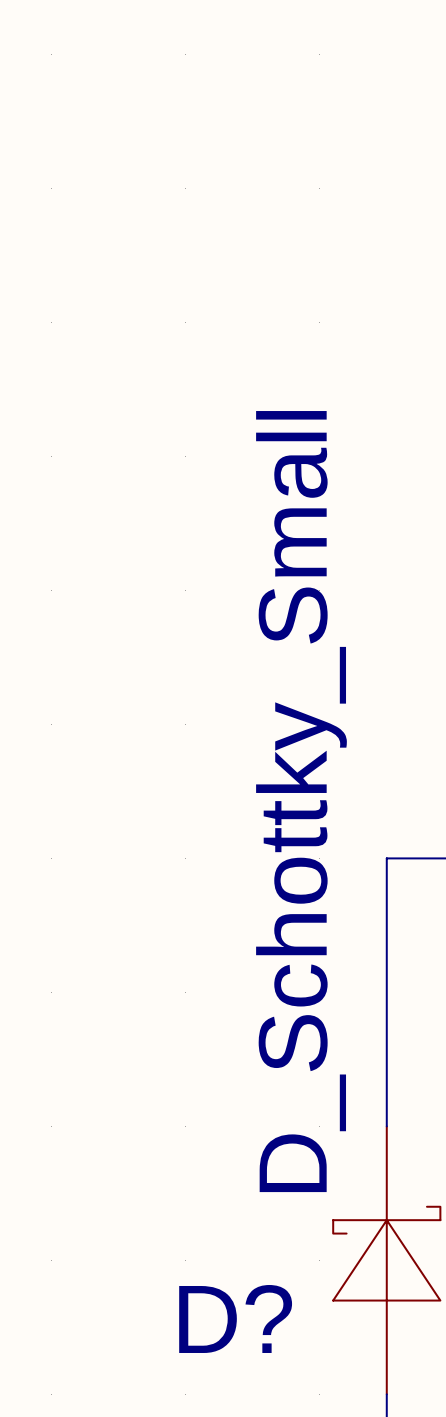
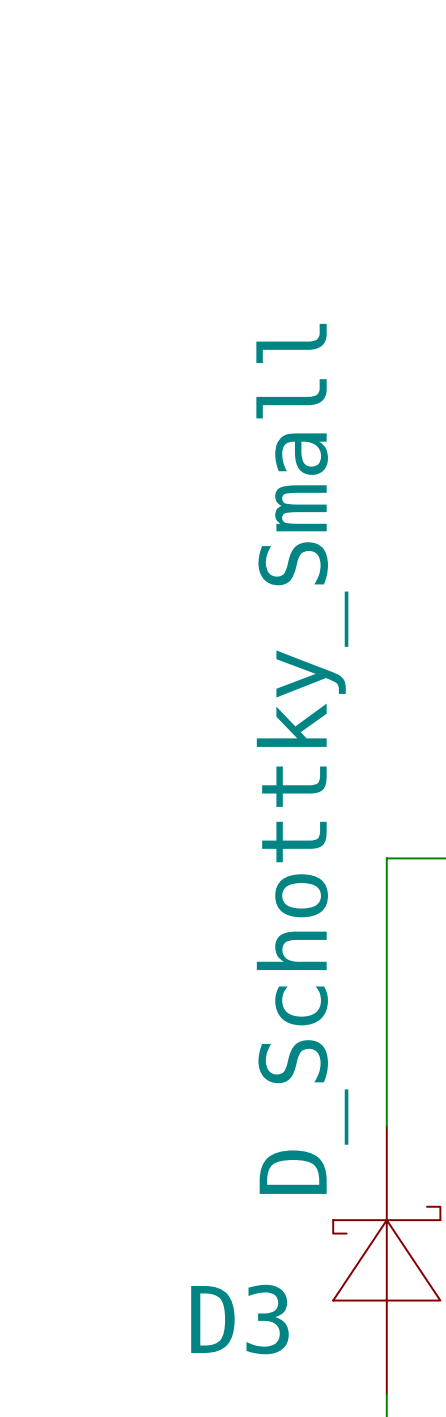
D? name: D? (235, 1318) -> D3 (239, 1319)

